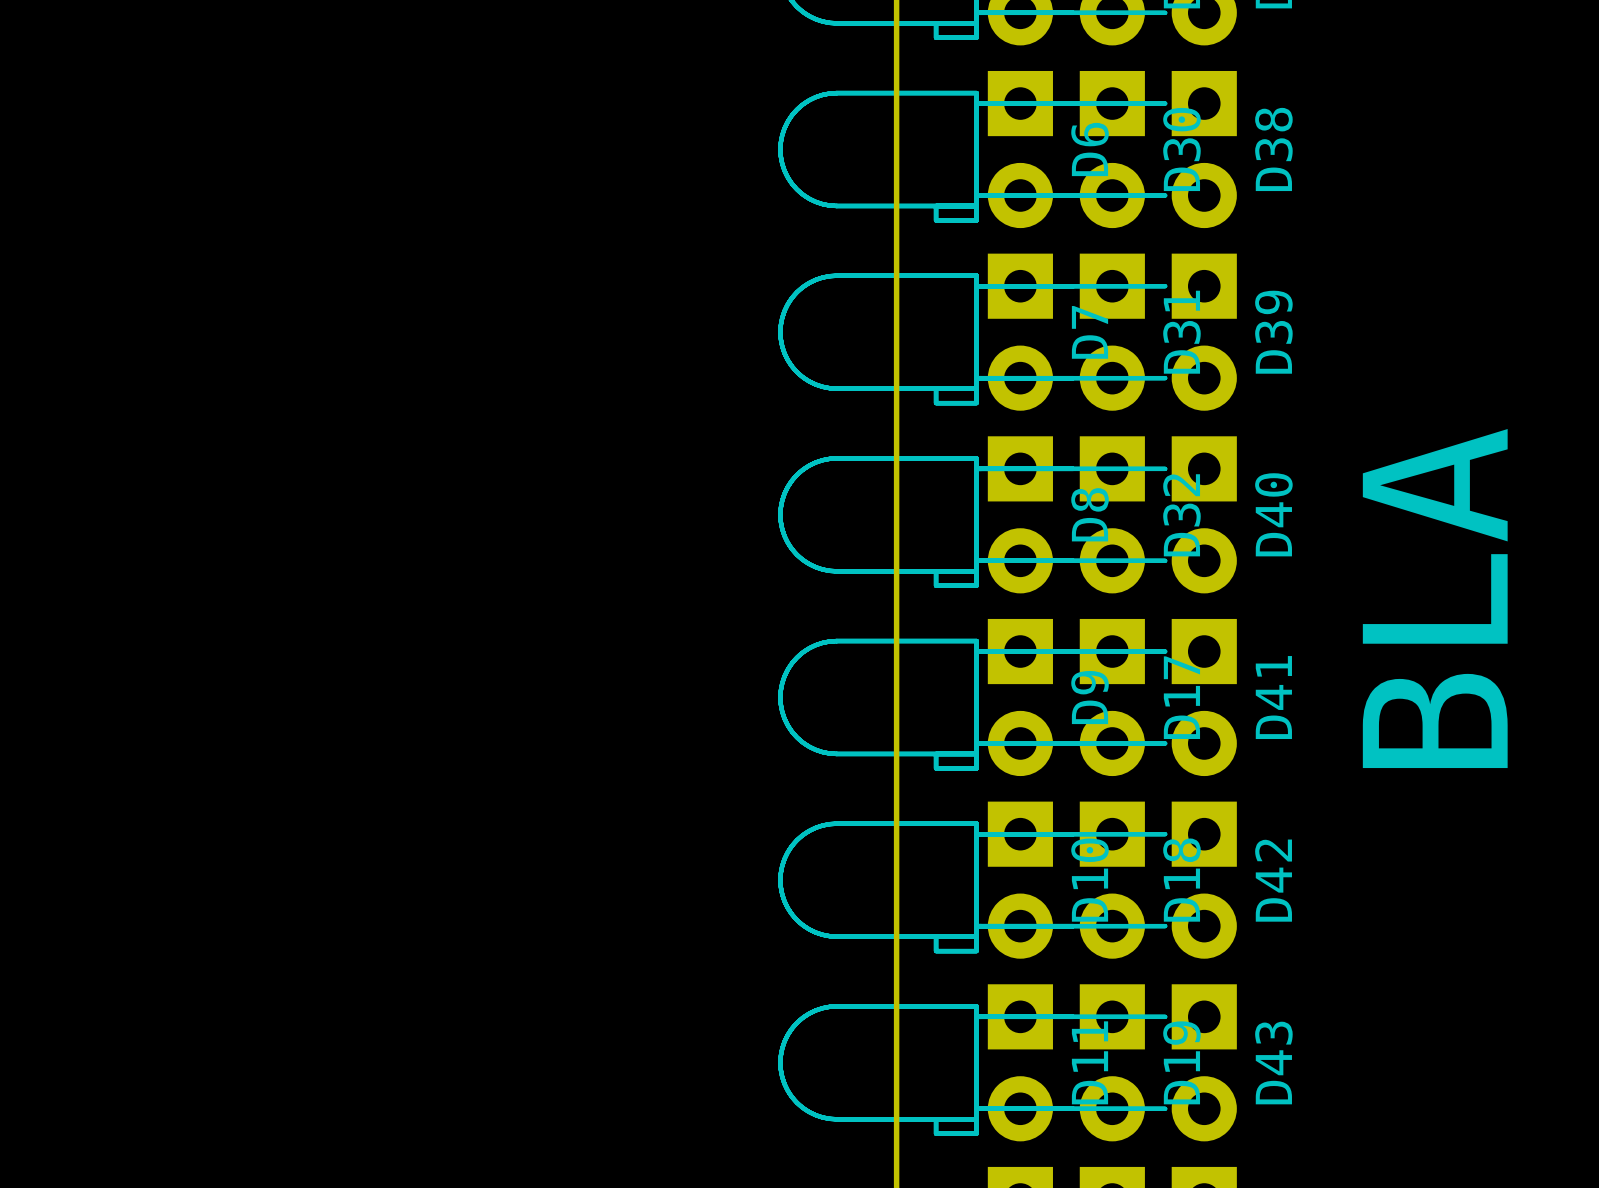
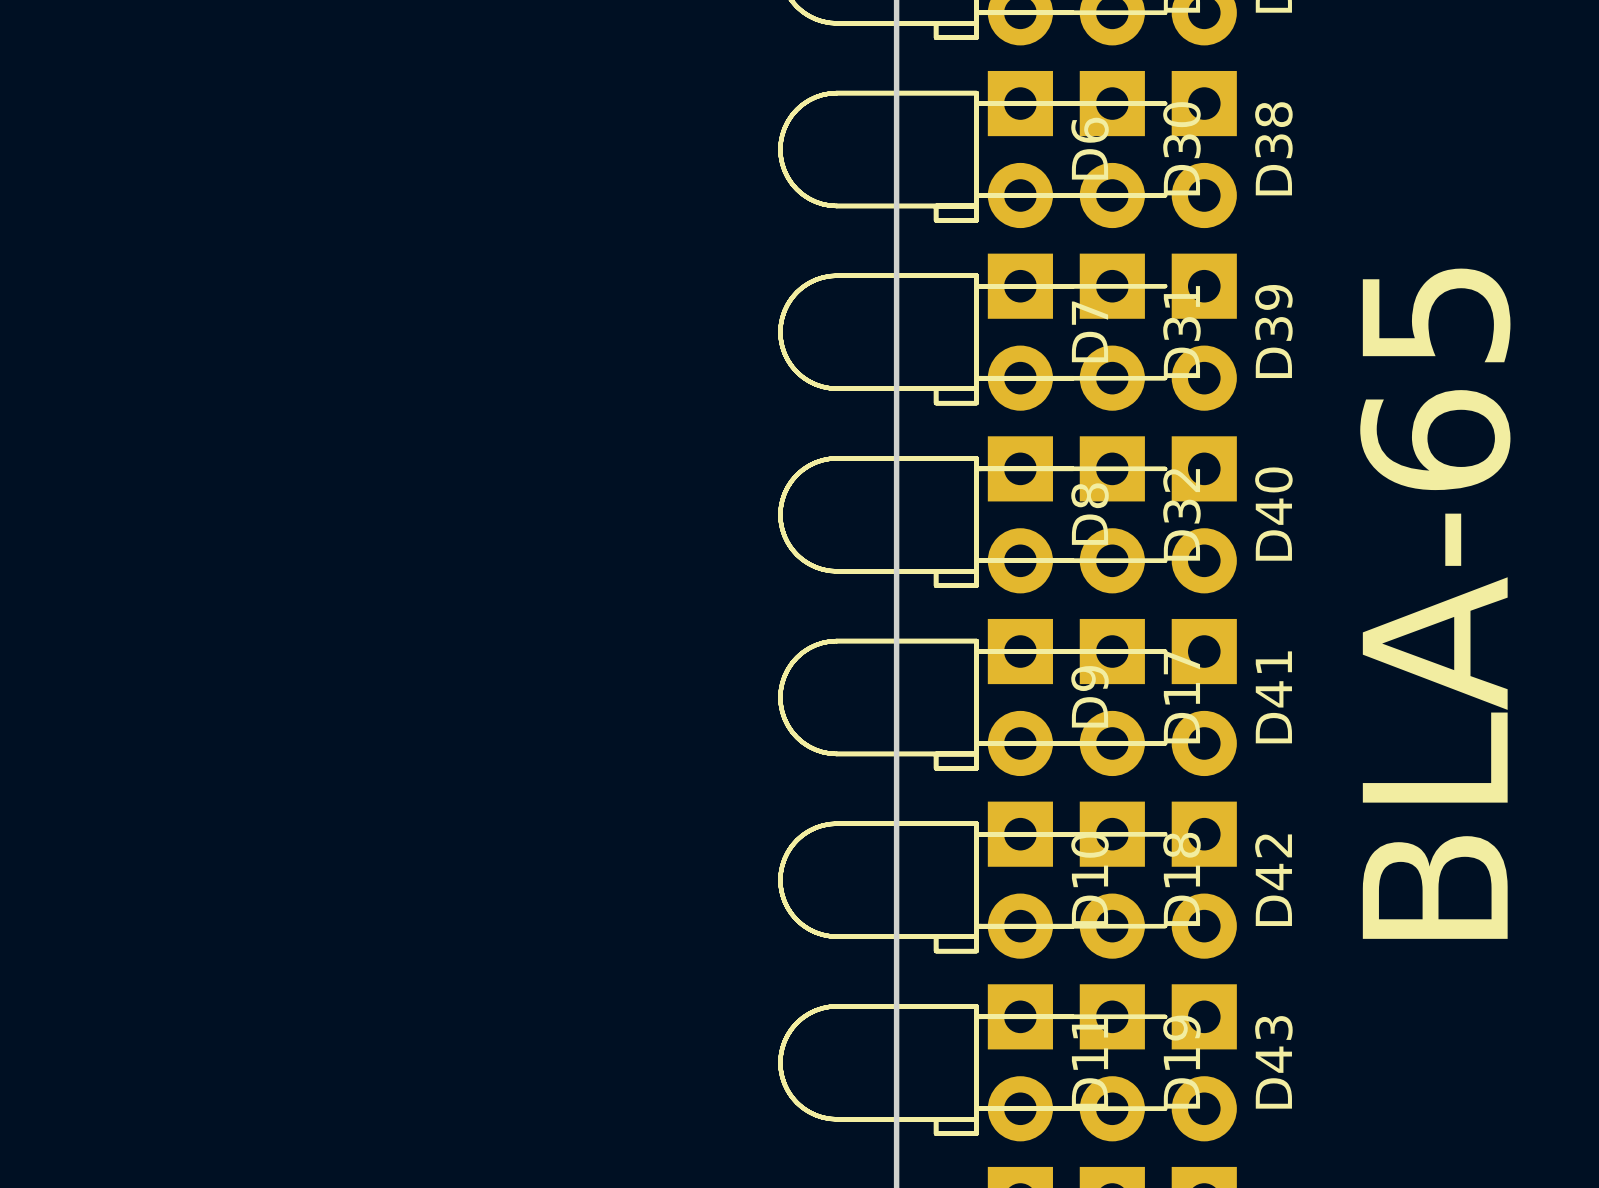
text: BLA (1435, 598) -> BLA-65 (1435, 603)

